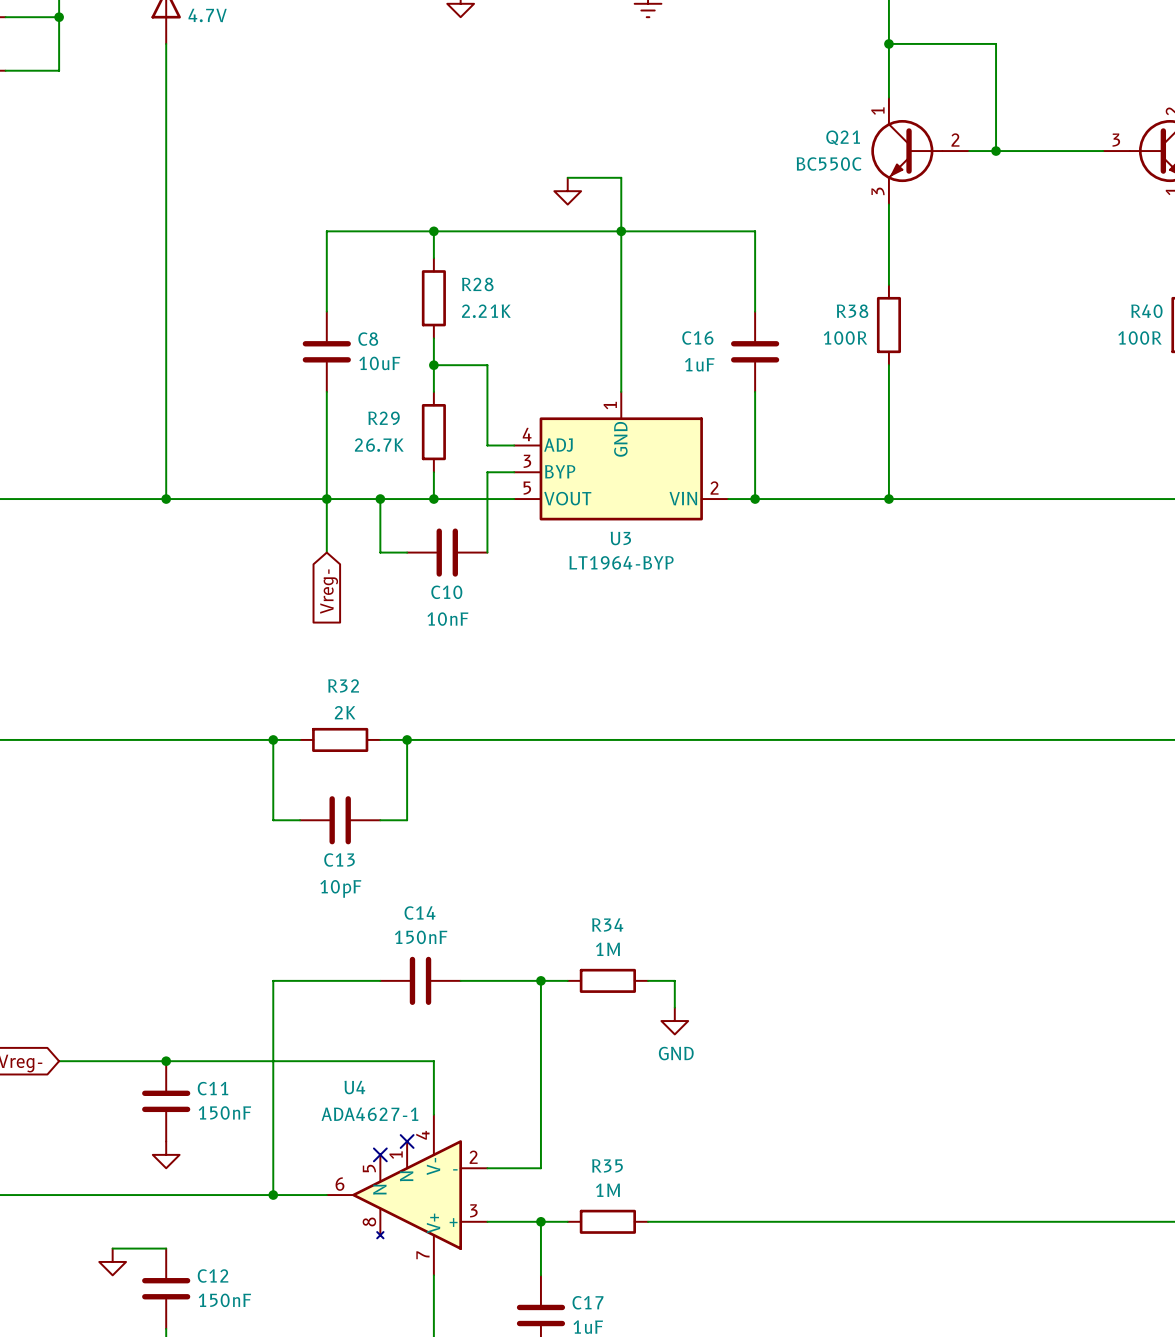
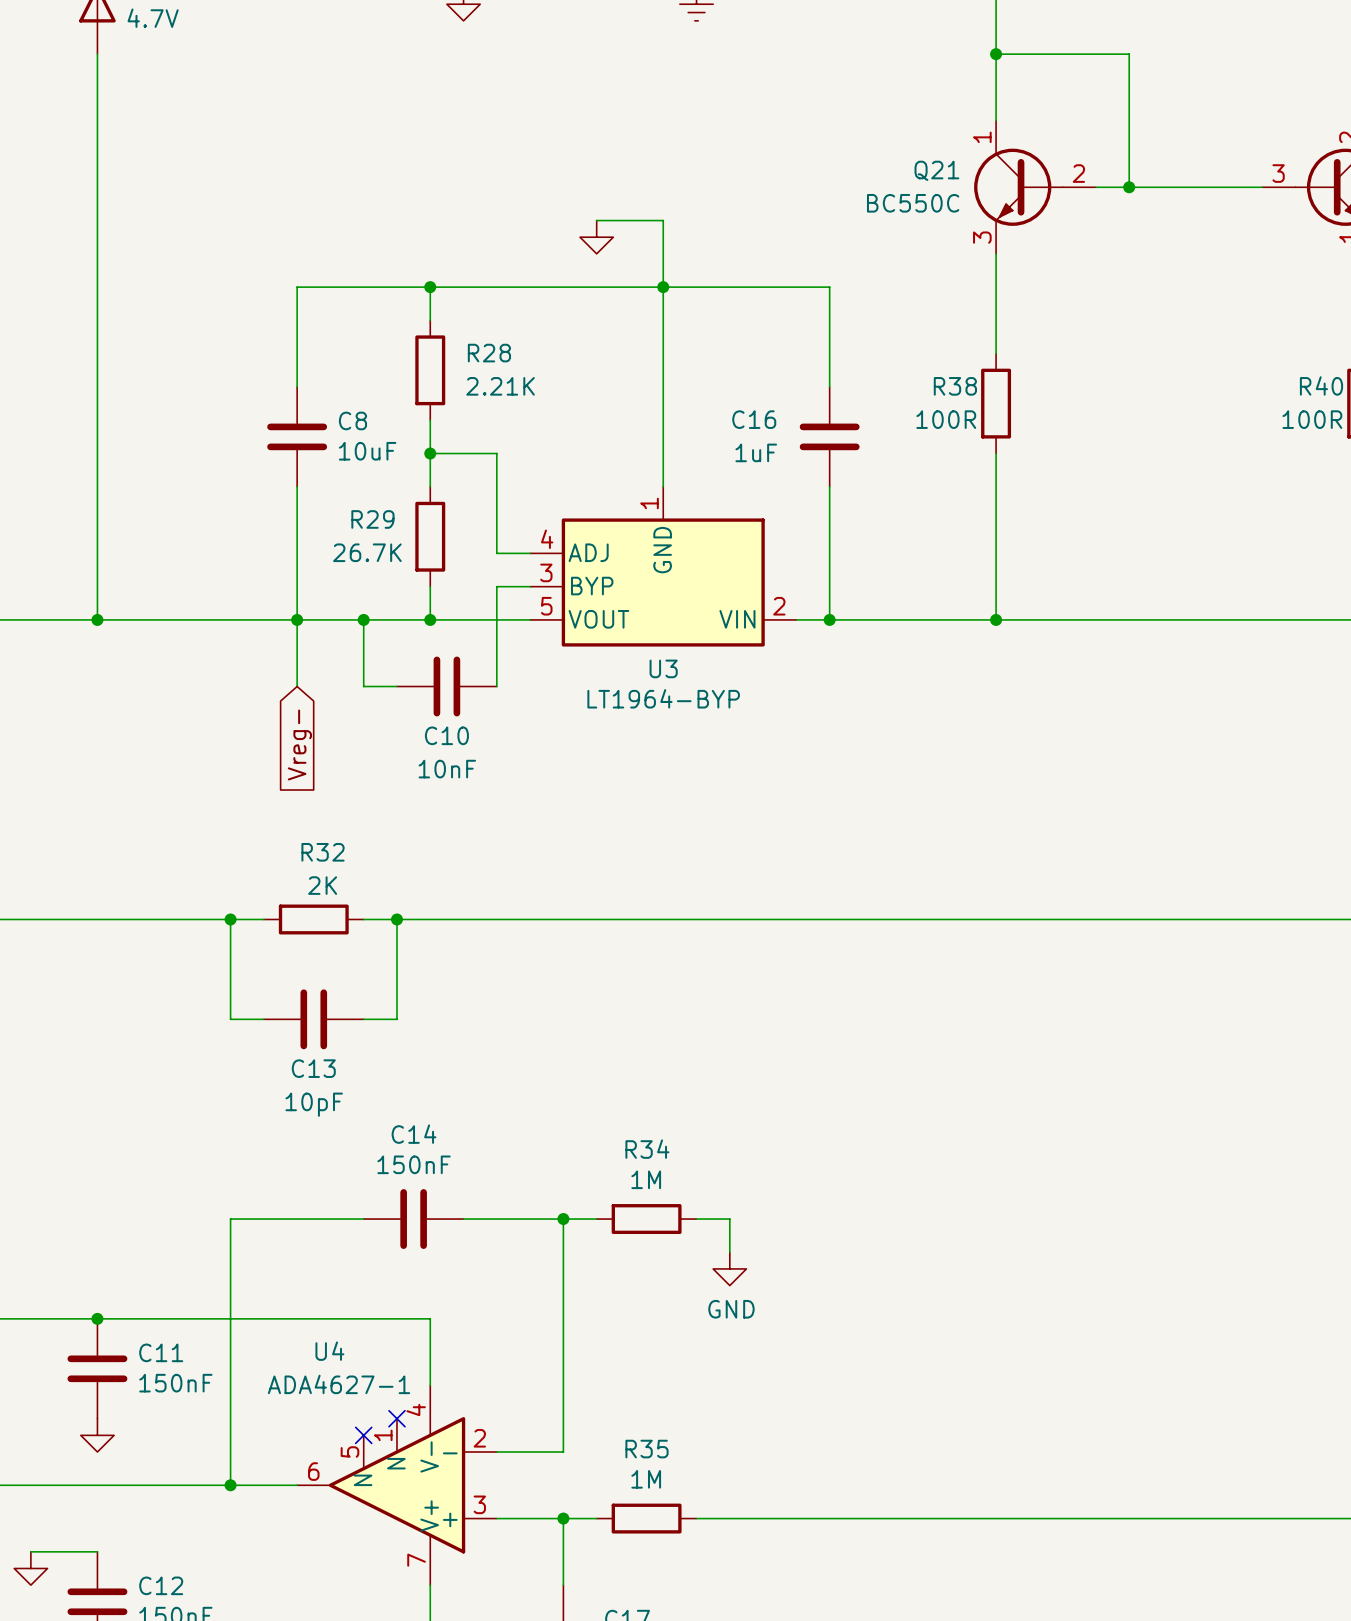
U4 symbol: [326, 1114, 488, 1276] -> [297, 1385, 497, 1586]

